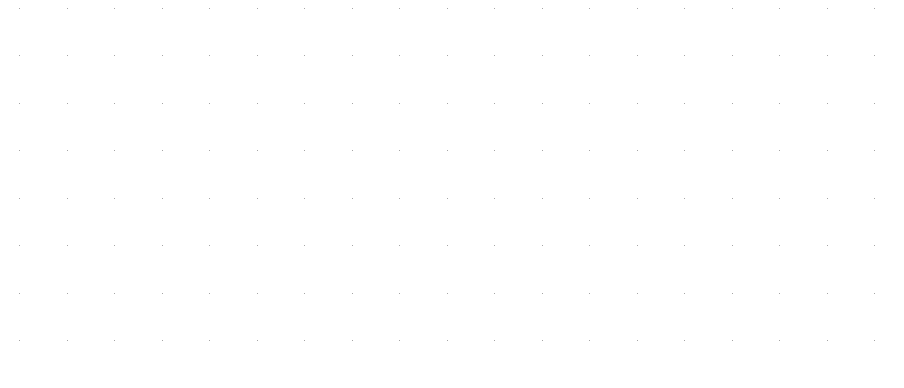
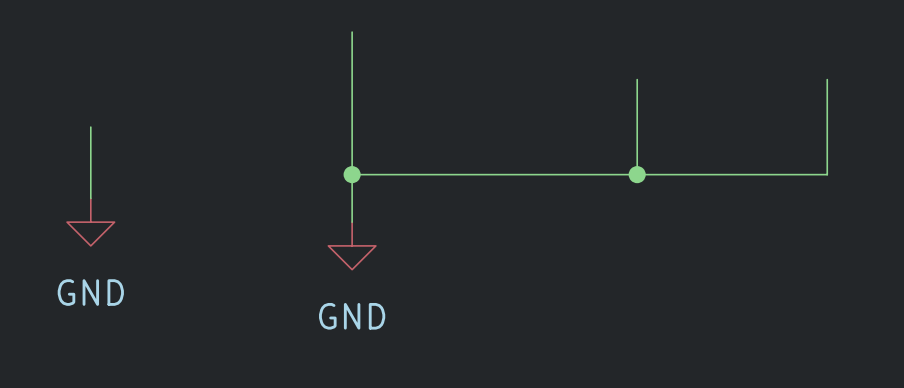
wire: none -> (352, 32) (352, 222)
wire: none -> (637, 79) (637, 174)
wire: none -> (827, 79) (827, 174) (352, 174)
wire: none -> (90, 127) (90, 198)
junction: none -> (352, 174)
junction: none -> (637, 174)
power symbol: none -> GND (90, 222)
power symbol: none -> GND (352, 245)

